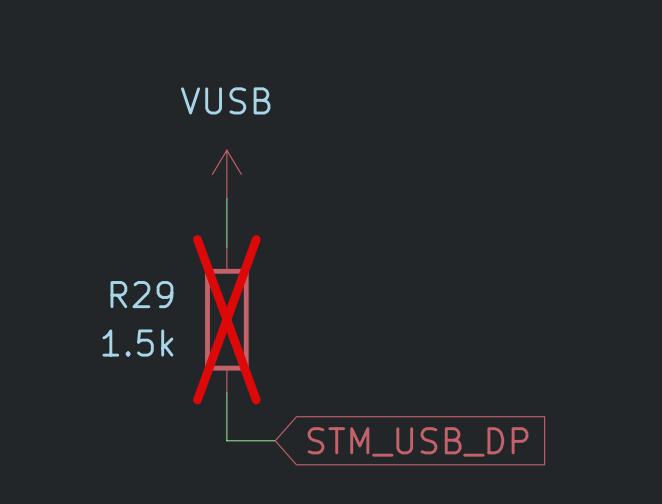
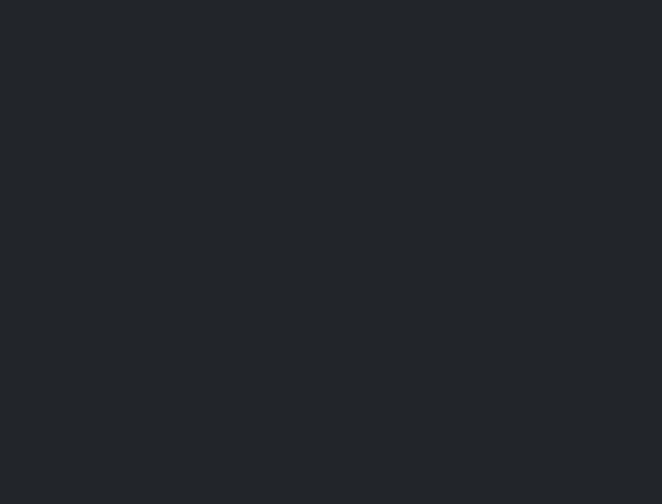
power symbol: VUSB (226, 174) -> none
wire: (226, 198) (226, 247) -> none
R29: 1.5k (226, 319) -> none
wire: (226, 392) (226, 440) (275, 440) -> none
global label: STM_USB_DP (417, 441) -> none

